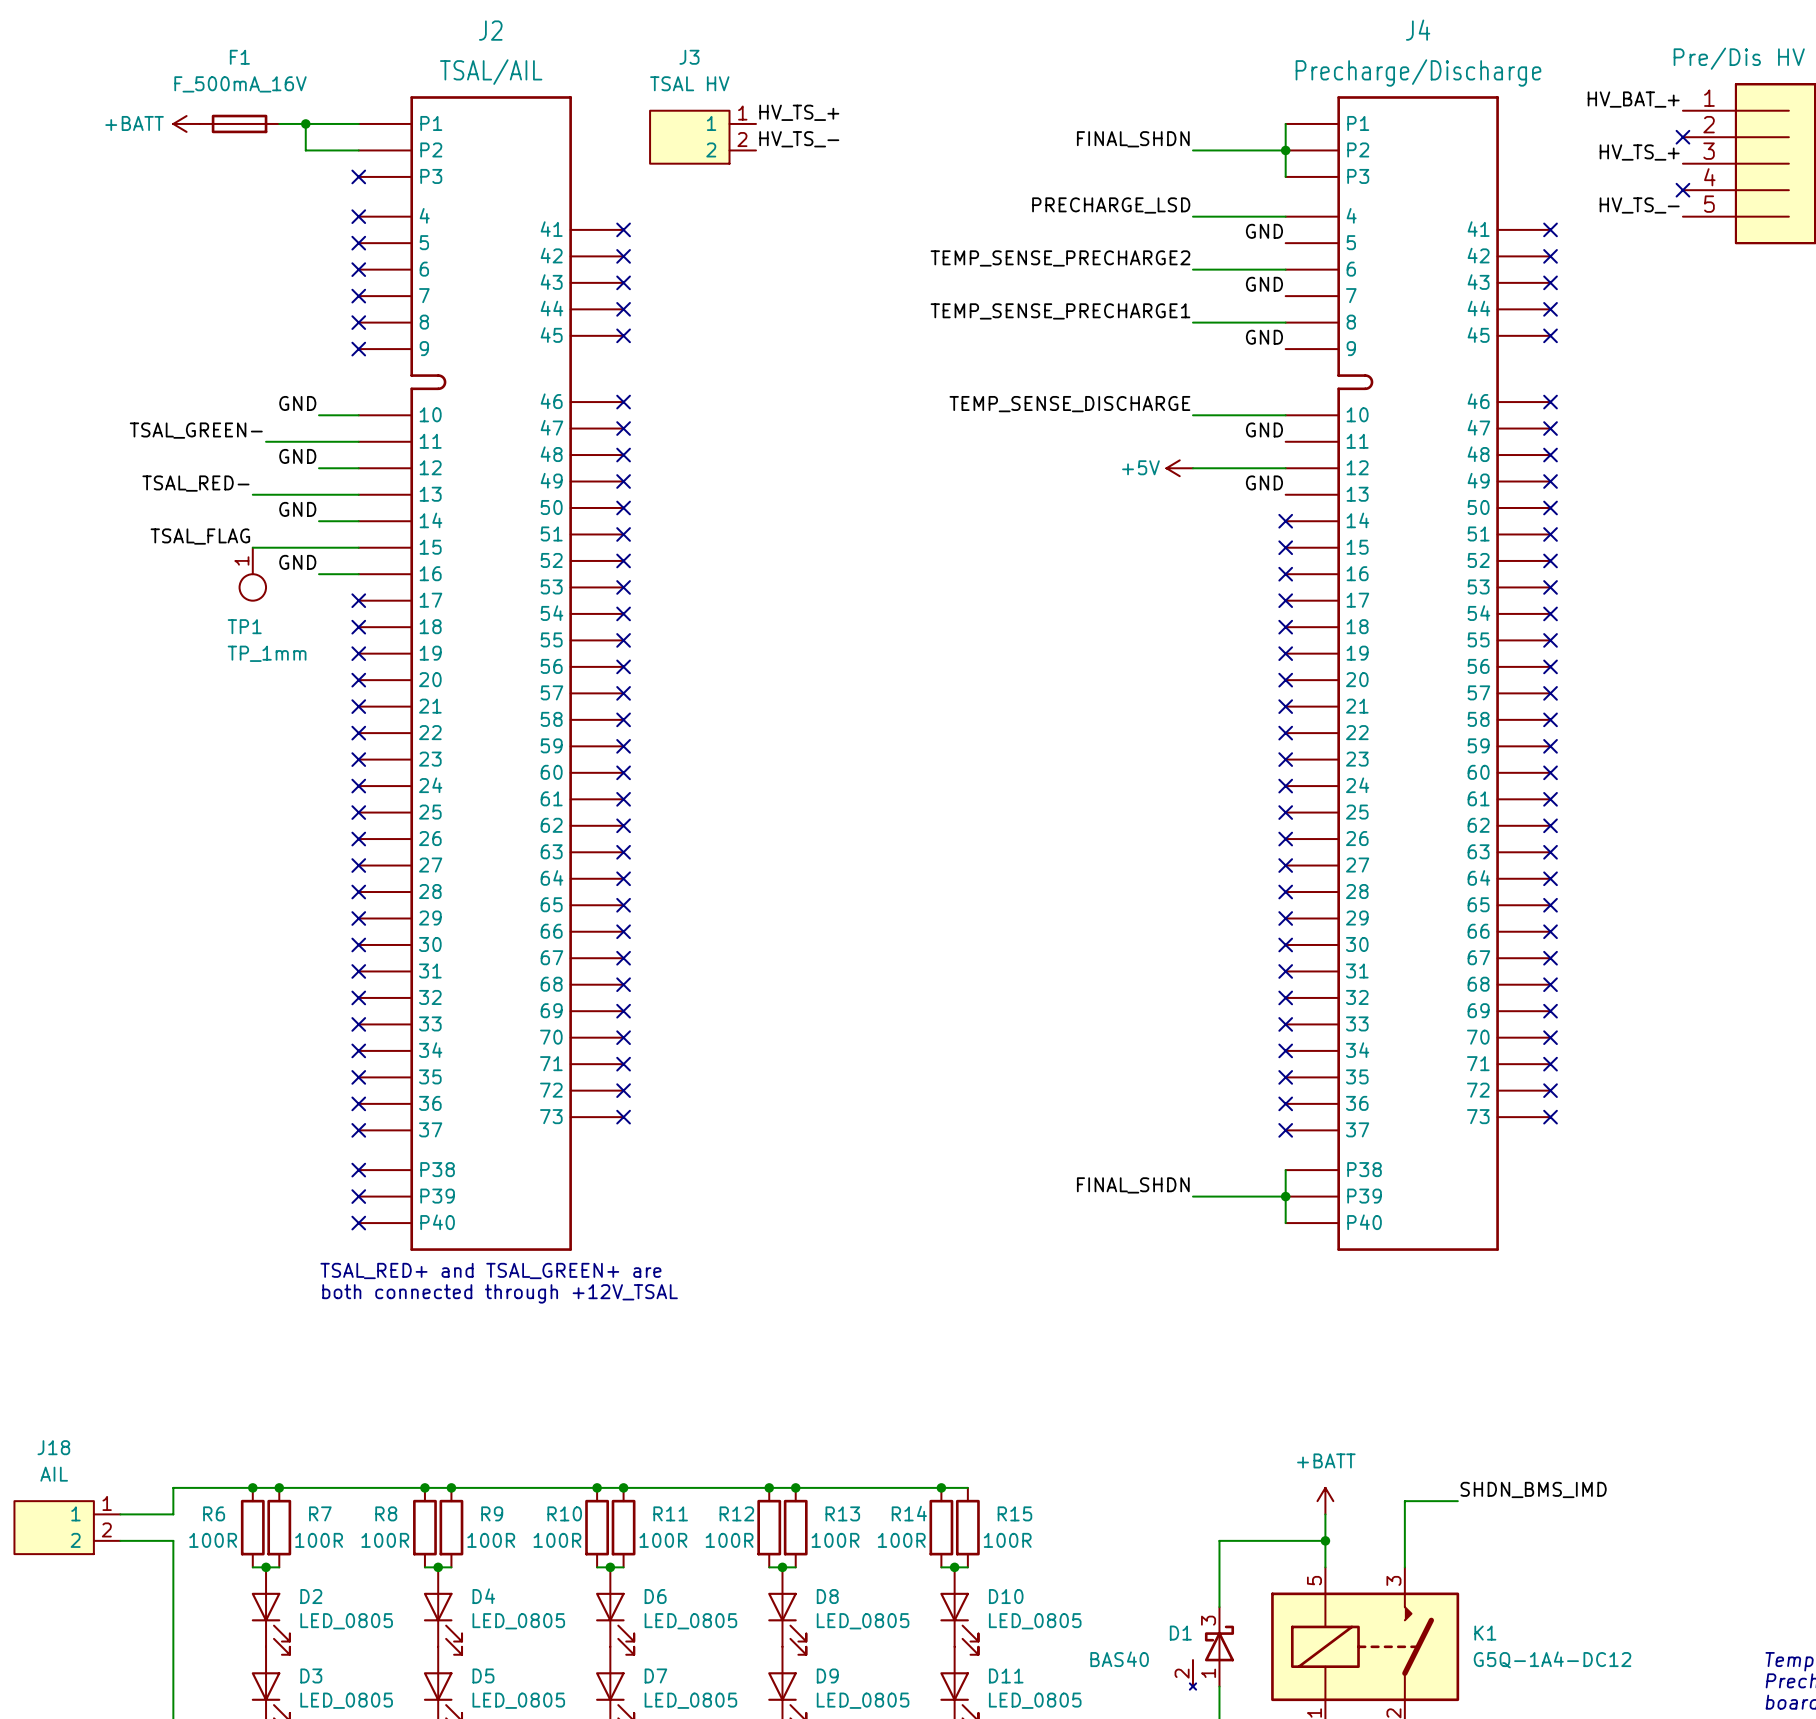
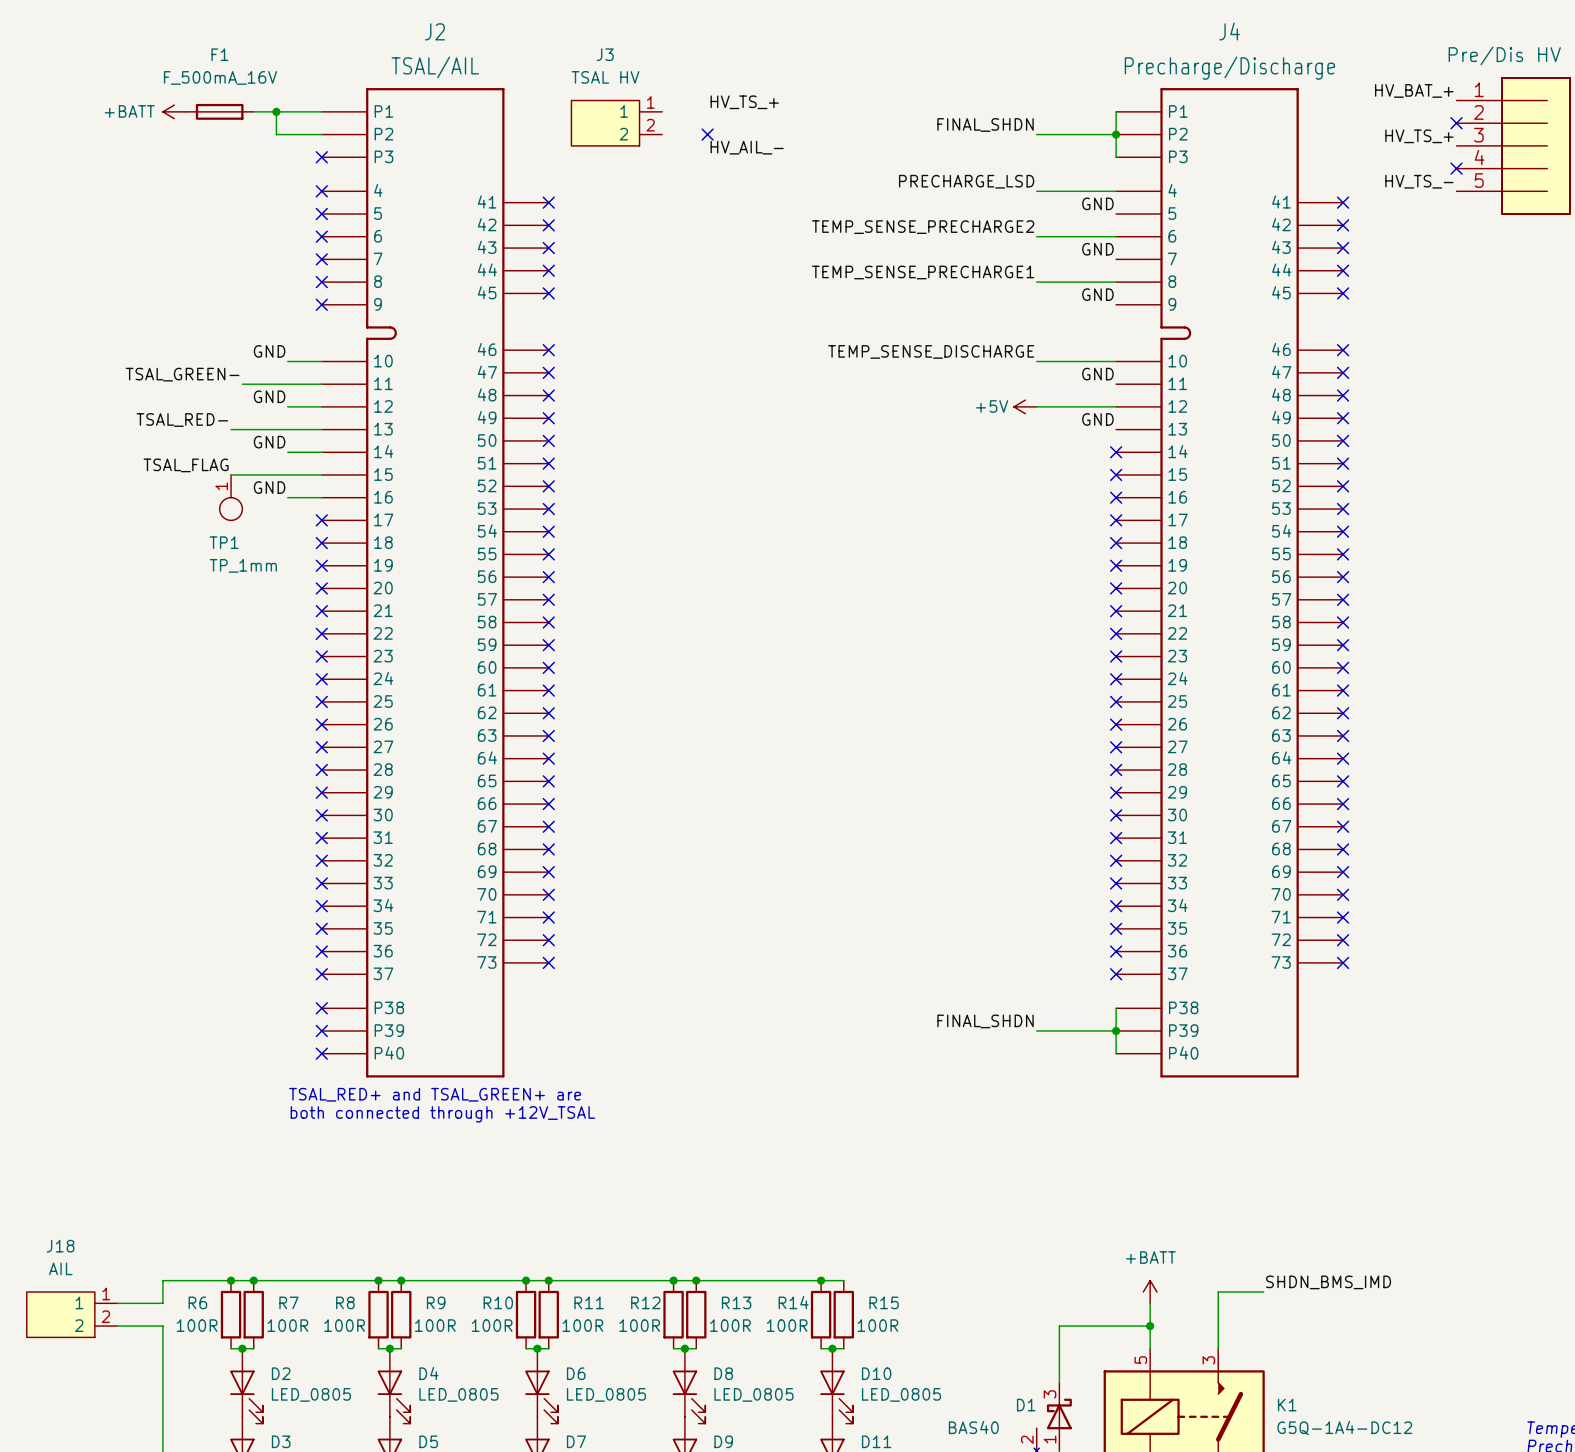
label position: HV_TS_+ (799, 112) -> HV_TS_+ (744, 102)
label: HV_TS_- (799, 139) -> HV_AIL_- (747, 147)
no-connect mark: none -> (707, 134)

